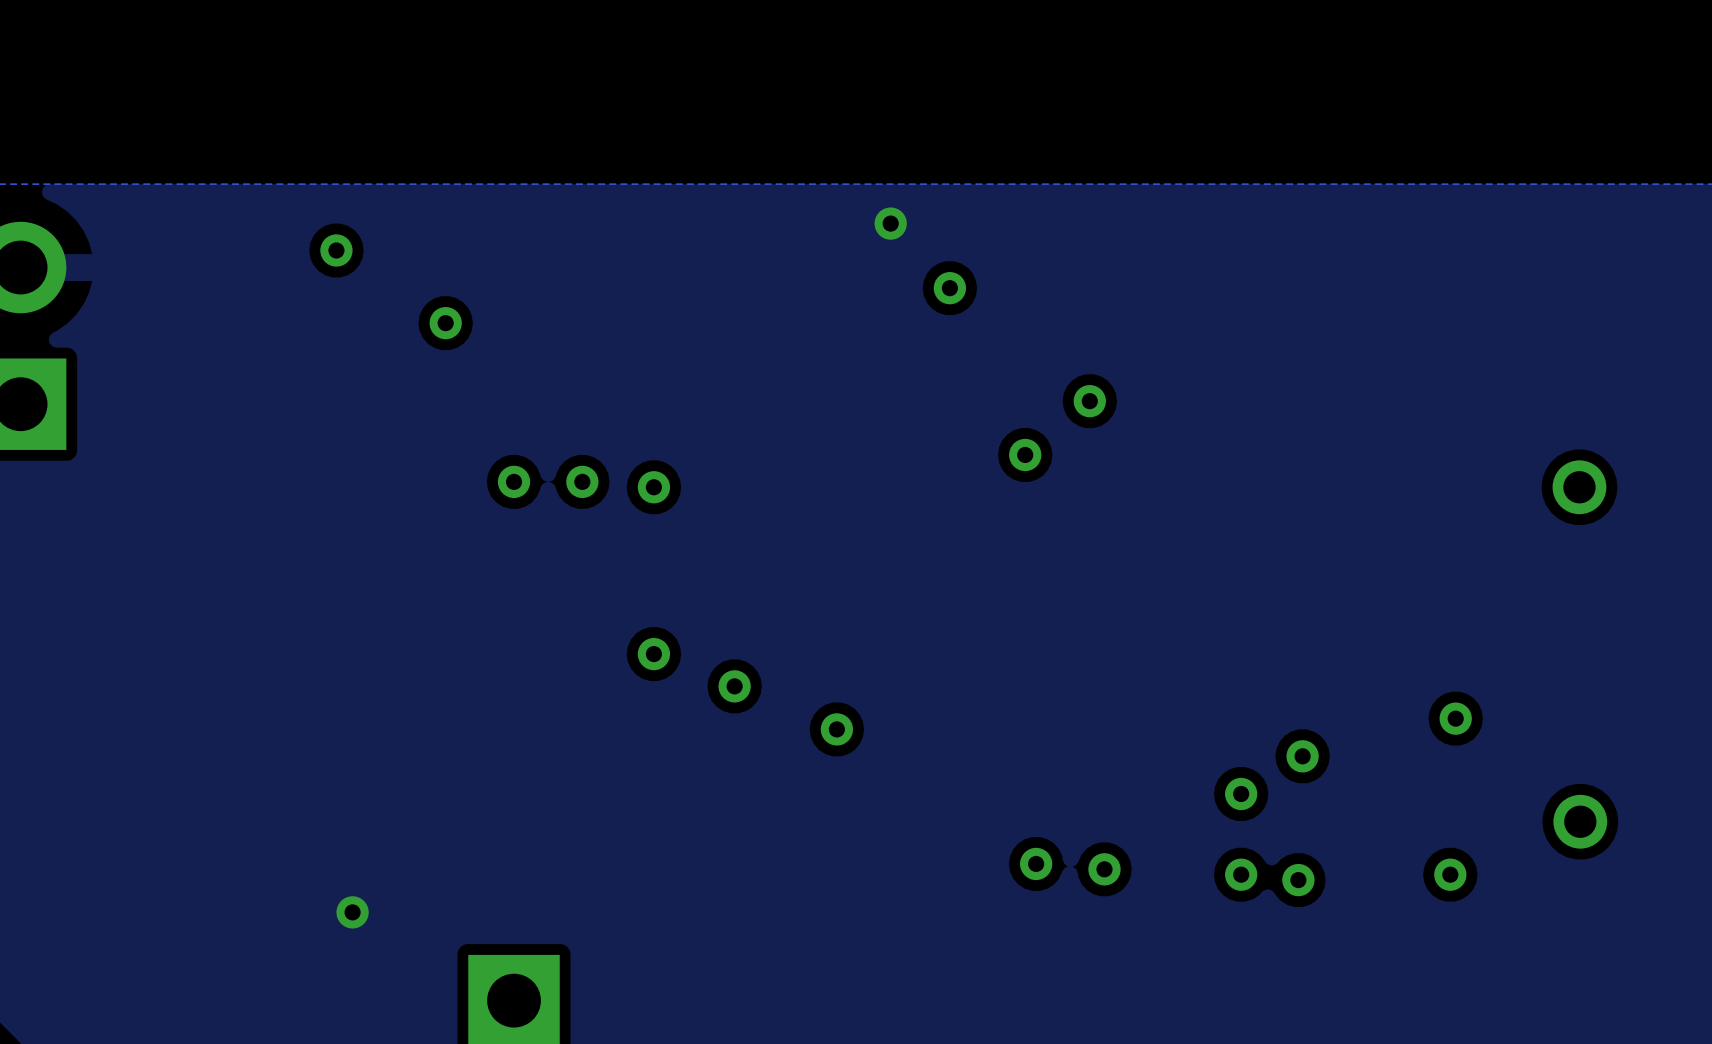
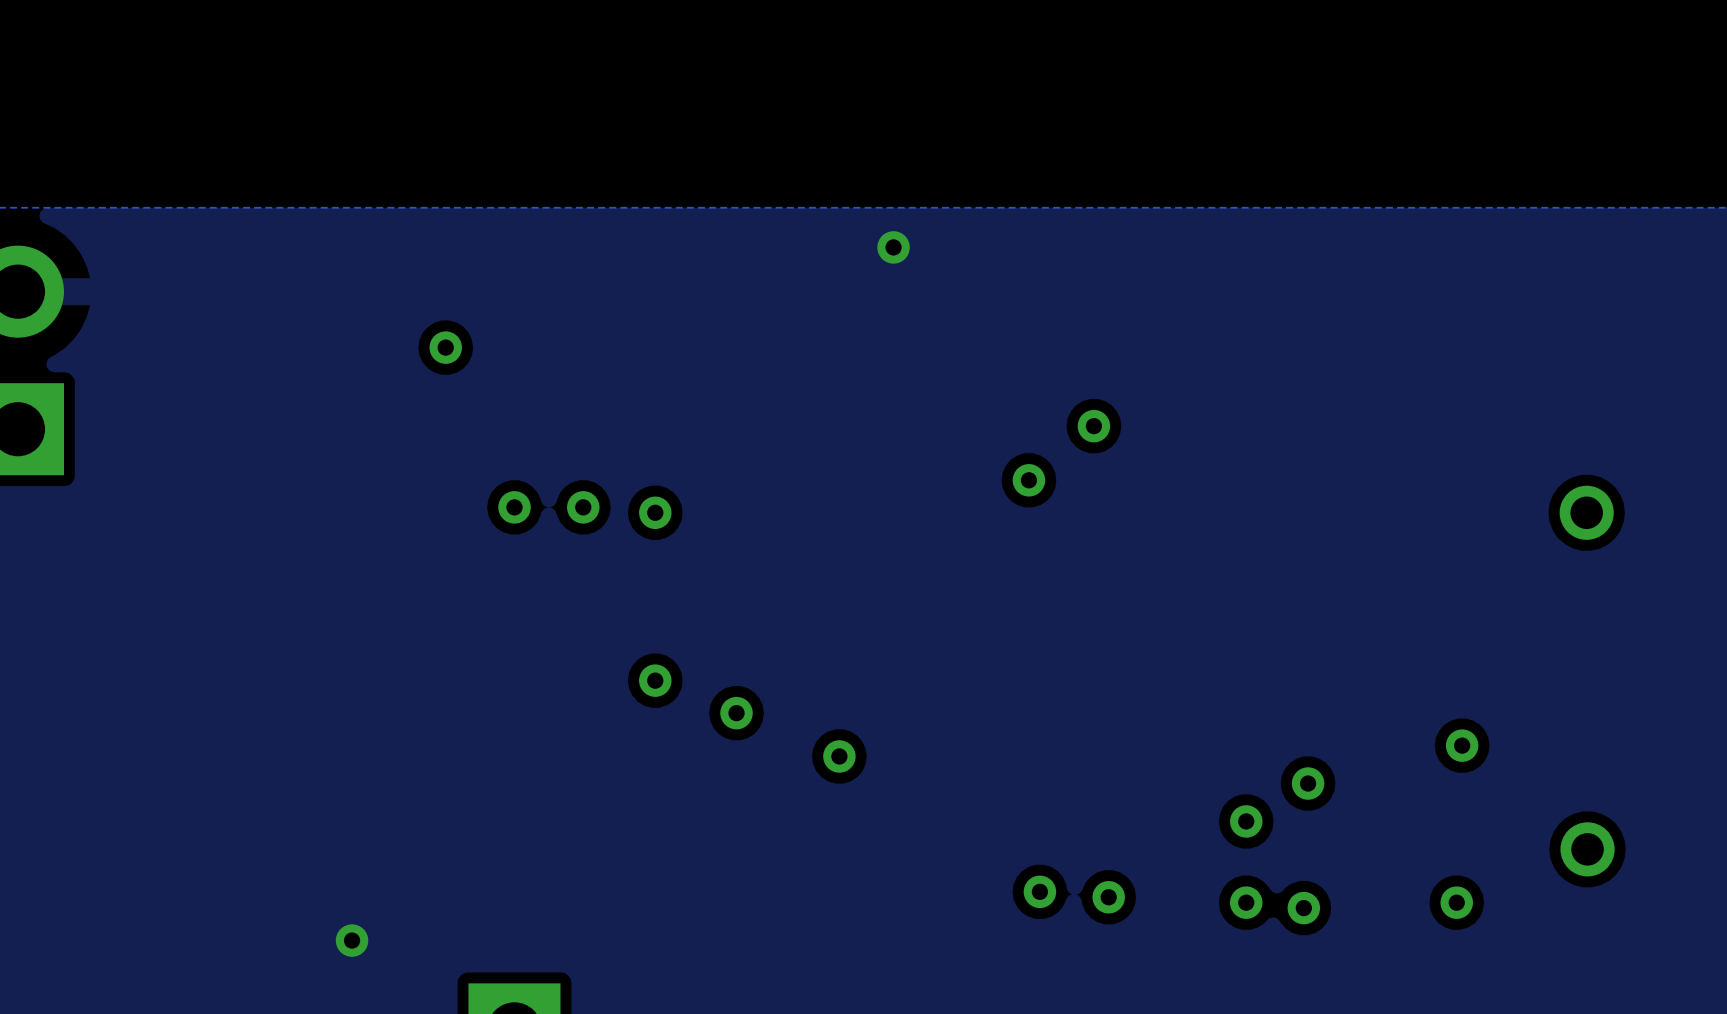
via: (336, 250) -> none
via: (949, 288) -> none

